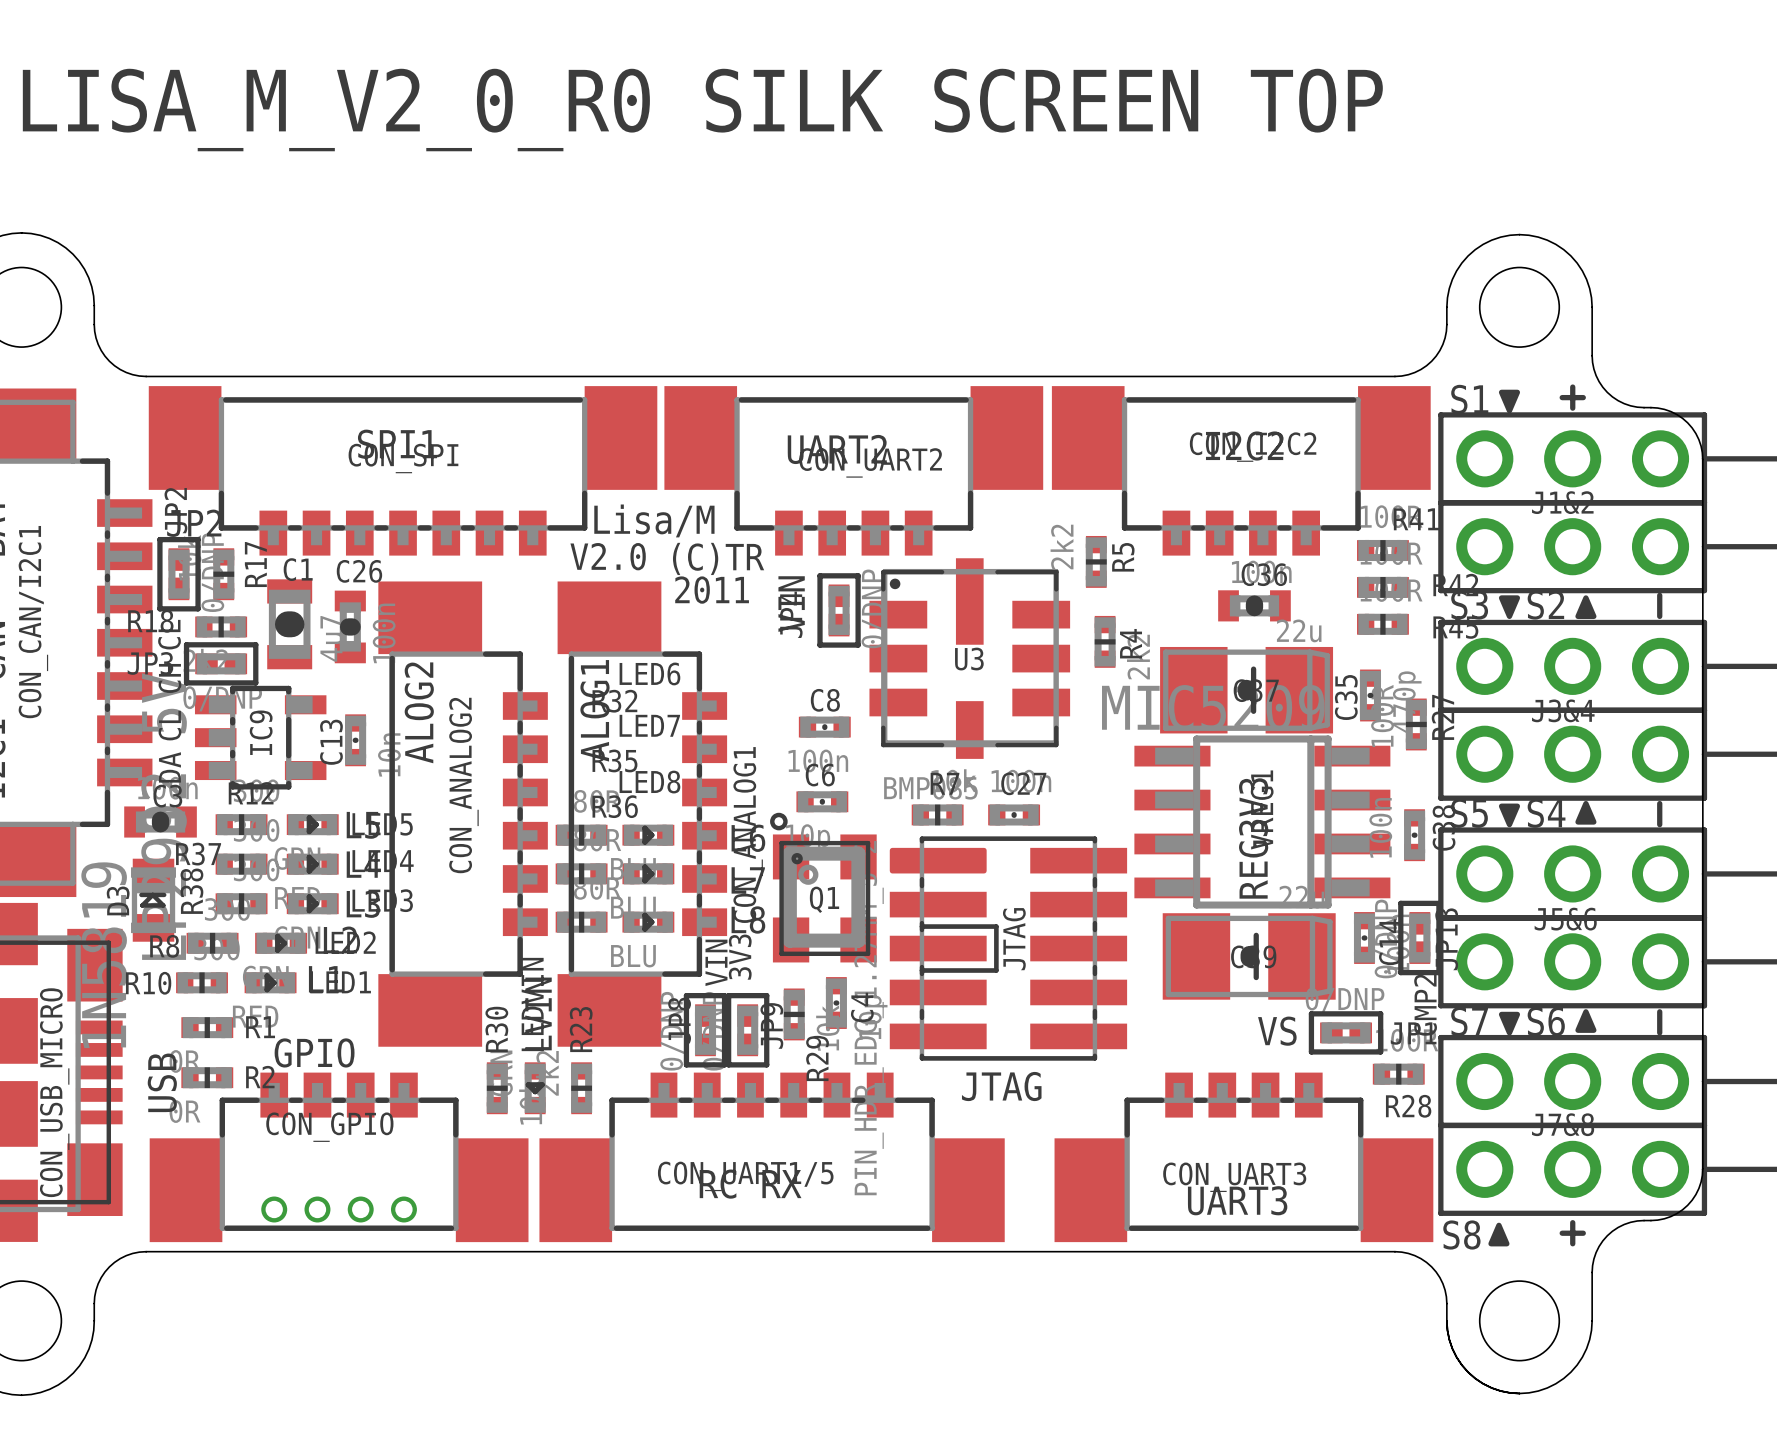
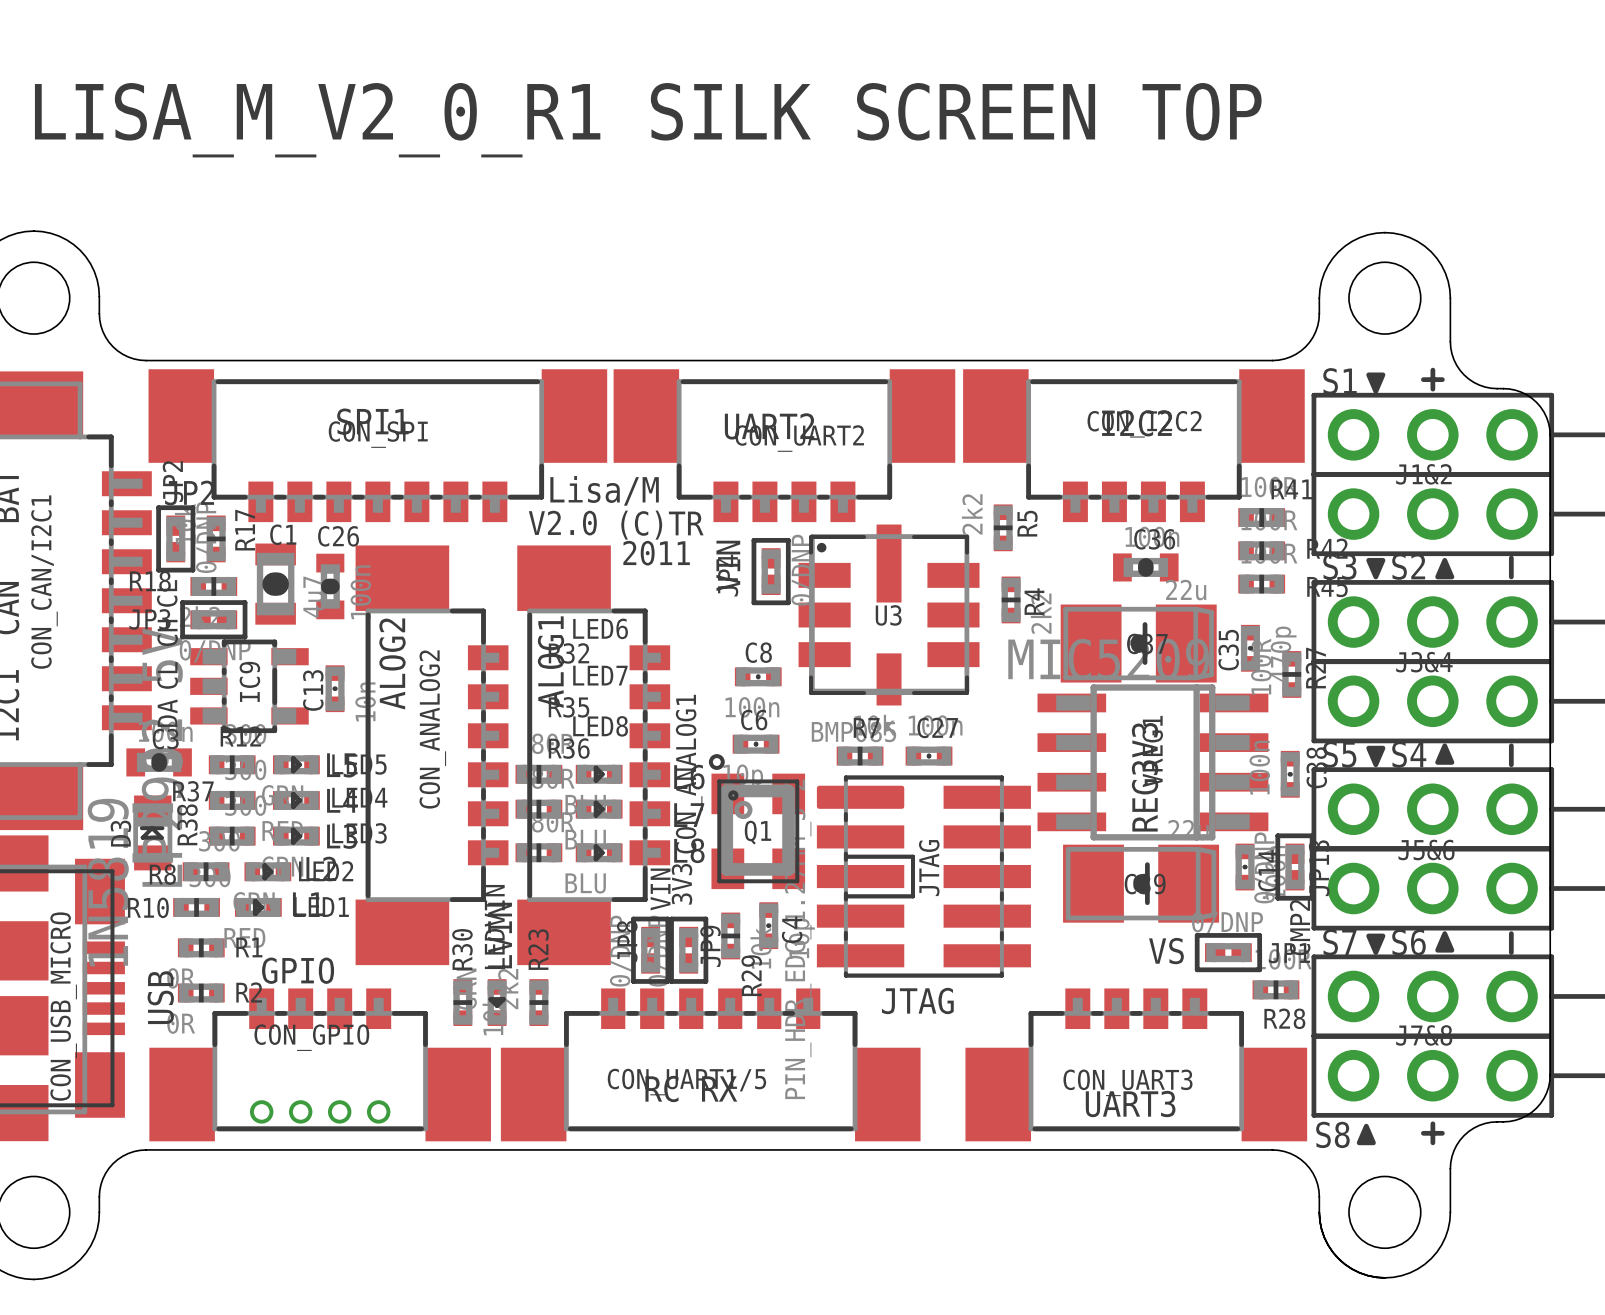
text: LISA_M_V2_0_R0 SILK SCREEN TOP (702, 110) -> LISA_M_V2_0_R1 SILK SCREEN TOP (648, 120)

